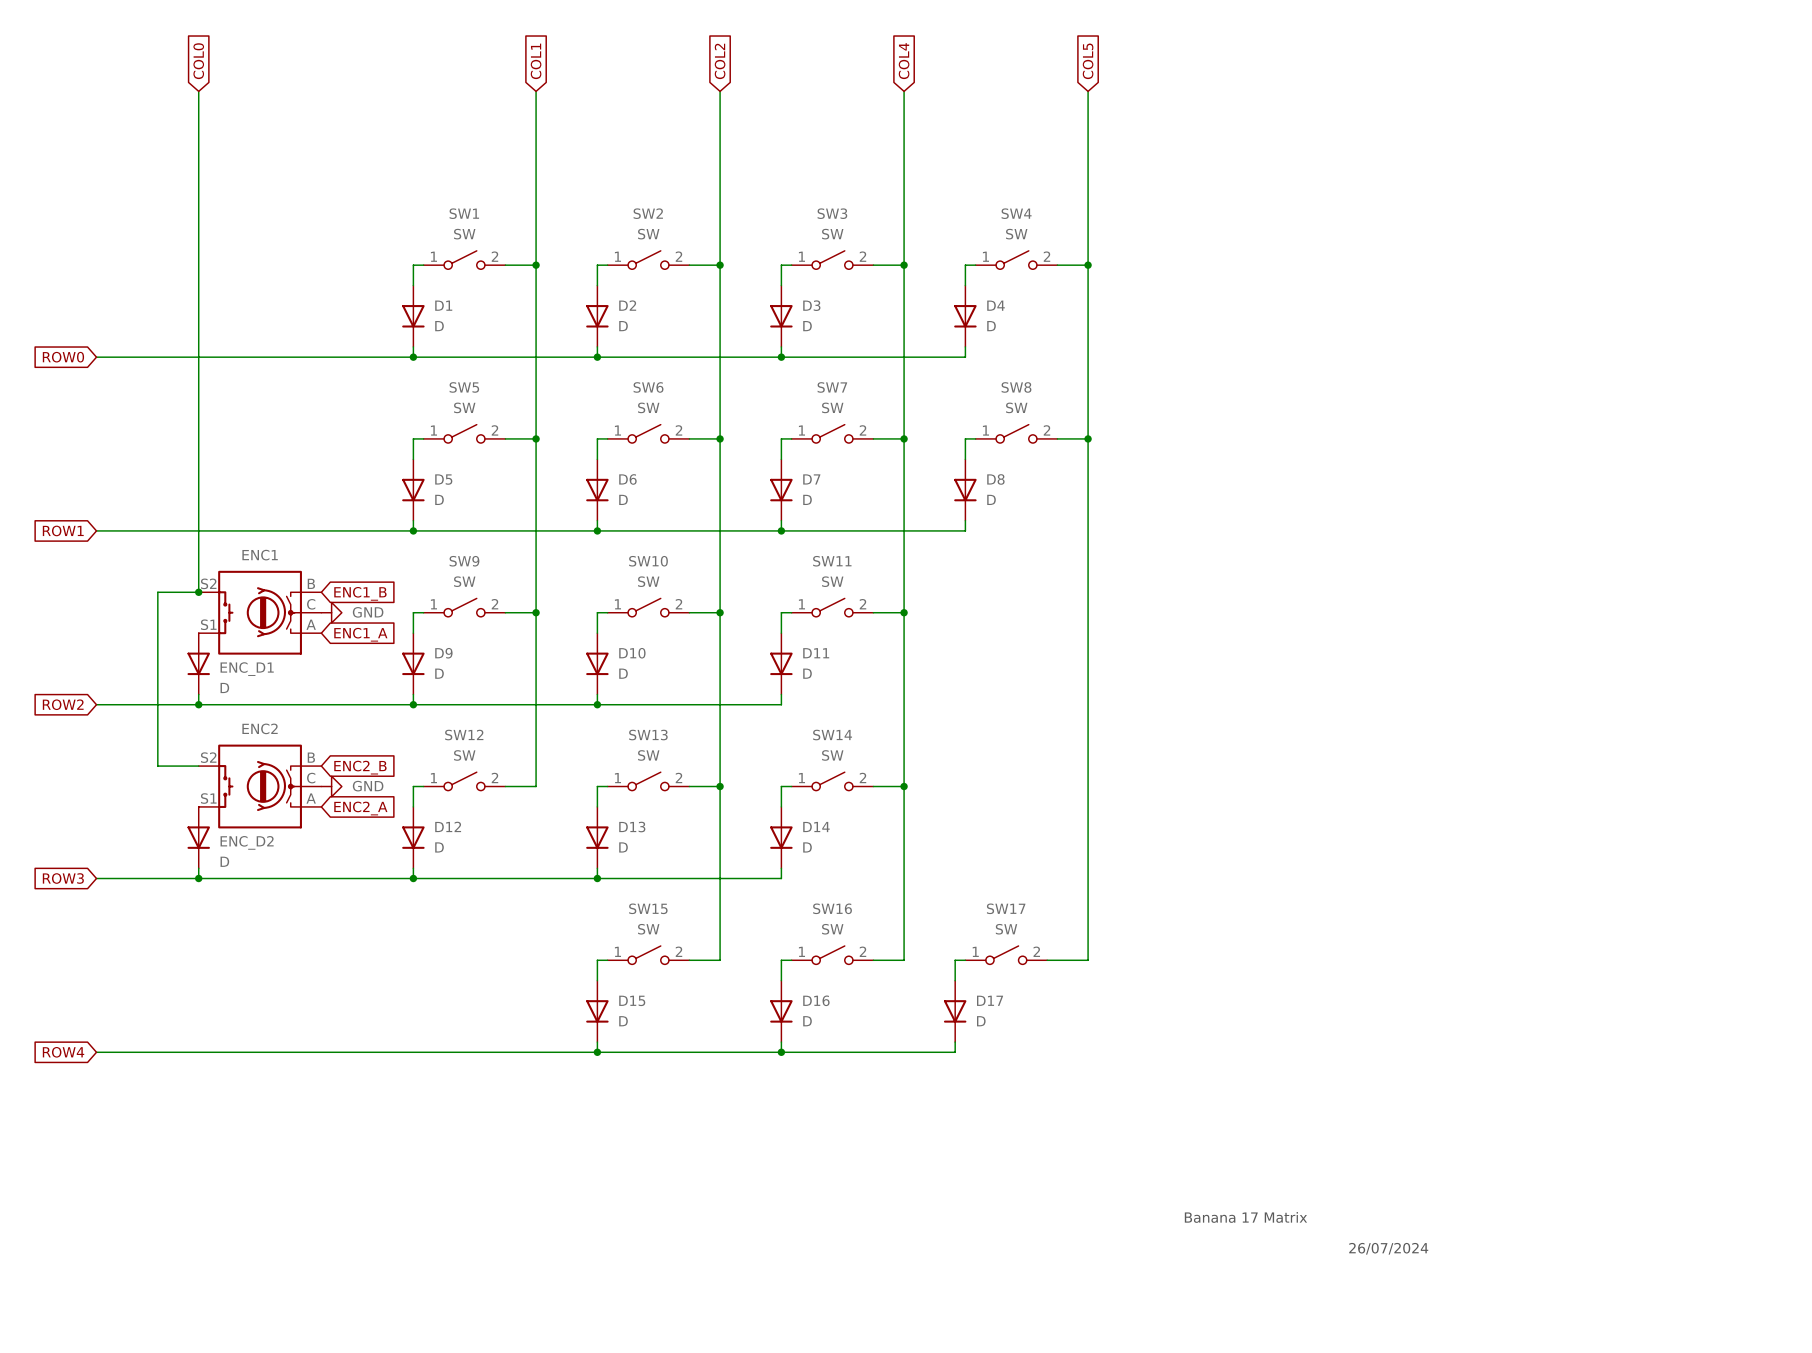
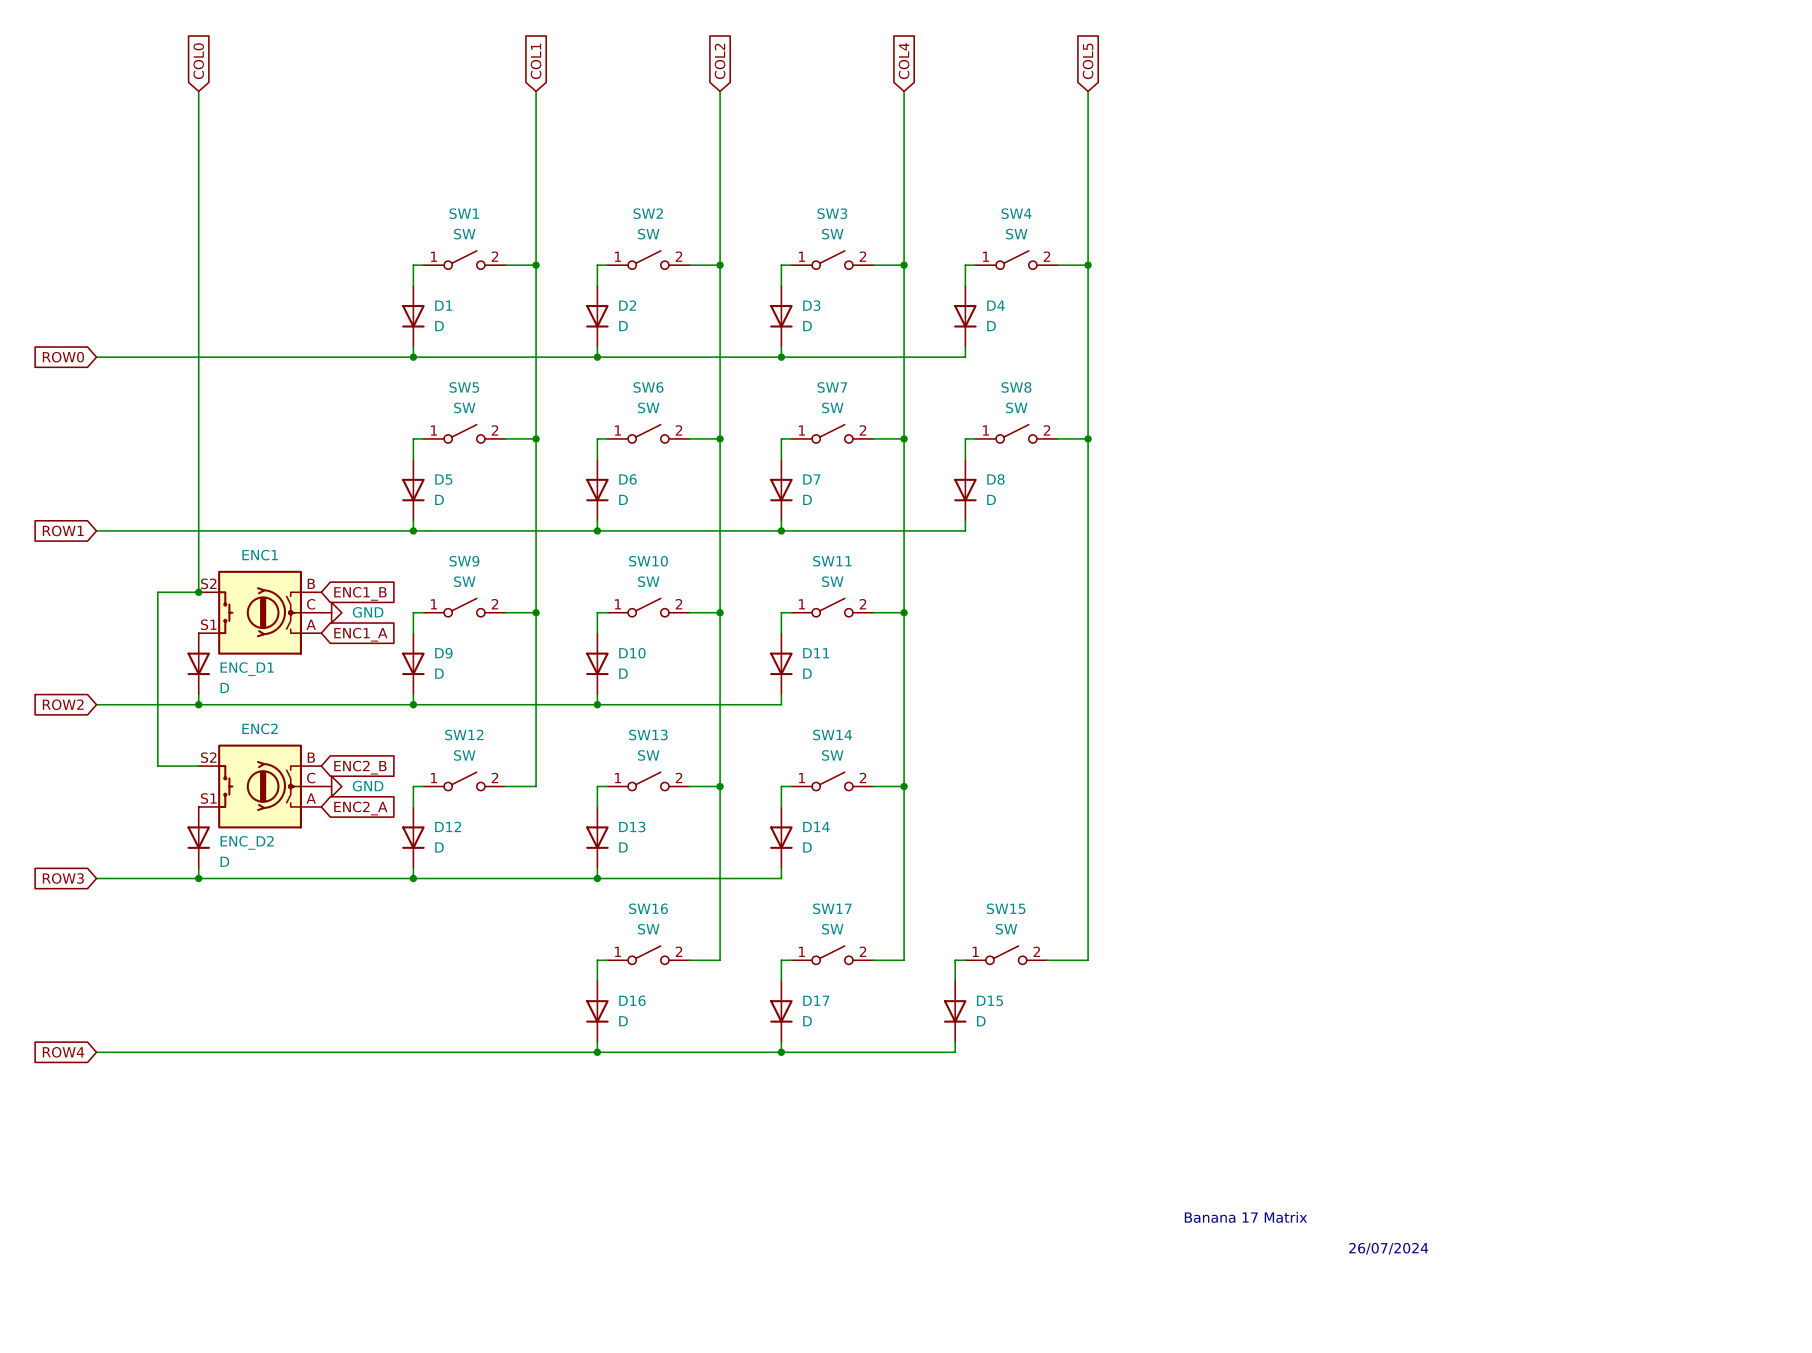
SW15 name: SW15 (648, 908) -> SW16 (648, 908)
SW16 name: SW16 (832, 908) -> SW17 (832, 908)
SW17 name: SW17 (1006, 908) -> SW15 (1006, 908)
D15 name: D15 (632, 1000) -> D16 (632, 1000)
D16 name: D16 (816, 1000) -> D17 (816, 1000)
D17 name: D17 (990, 1000) -> D15 (990, 1000)

